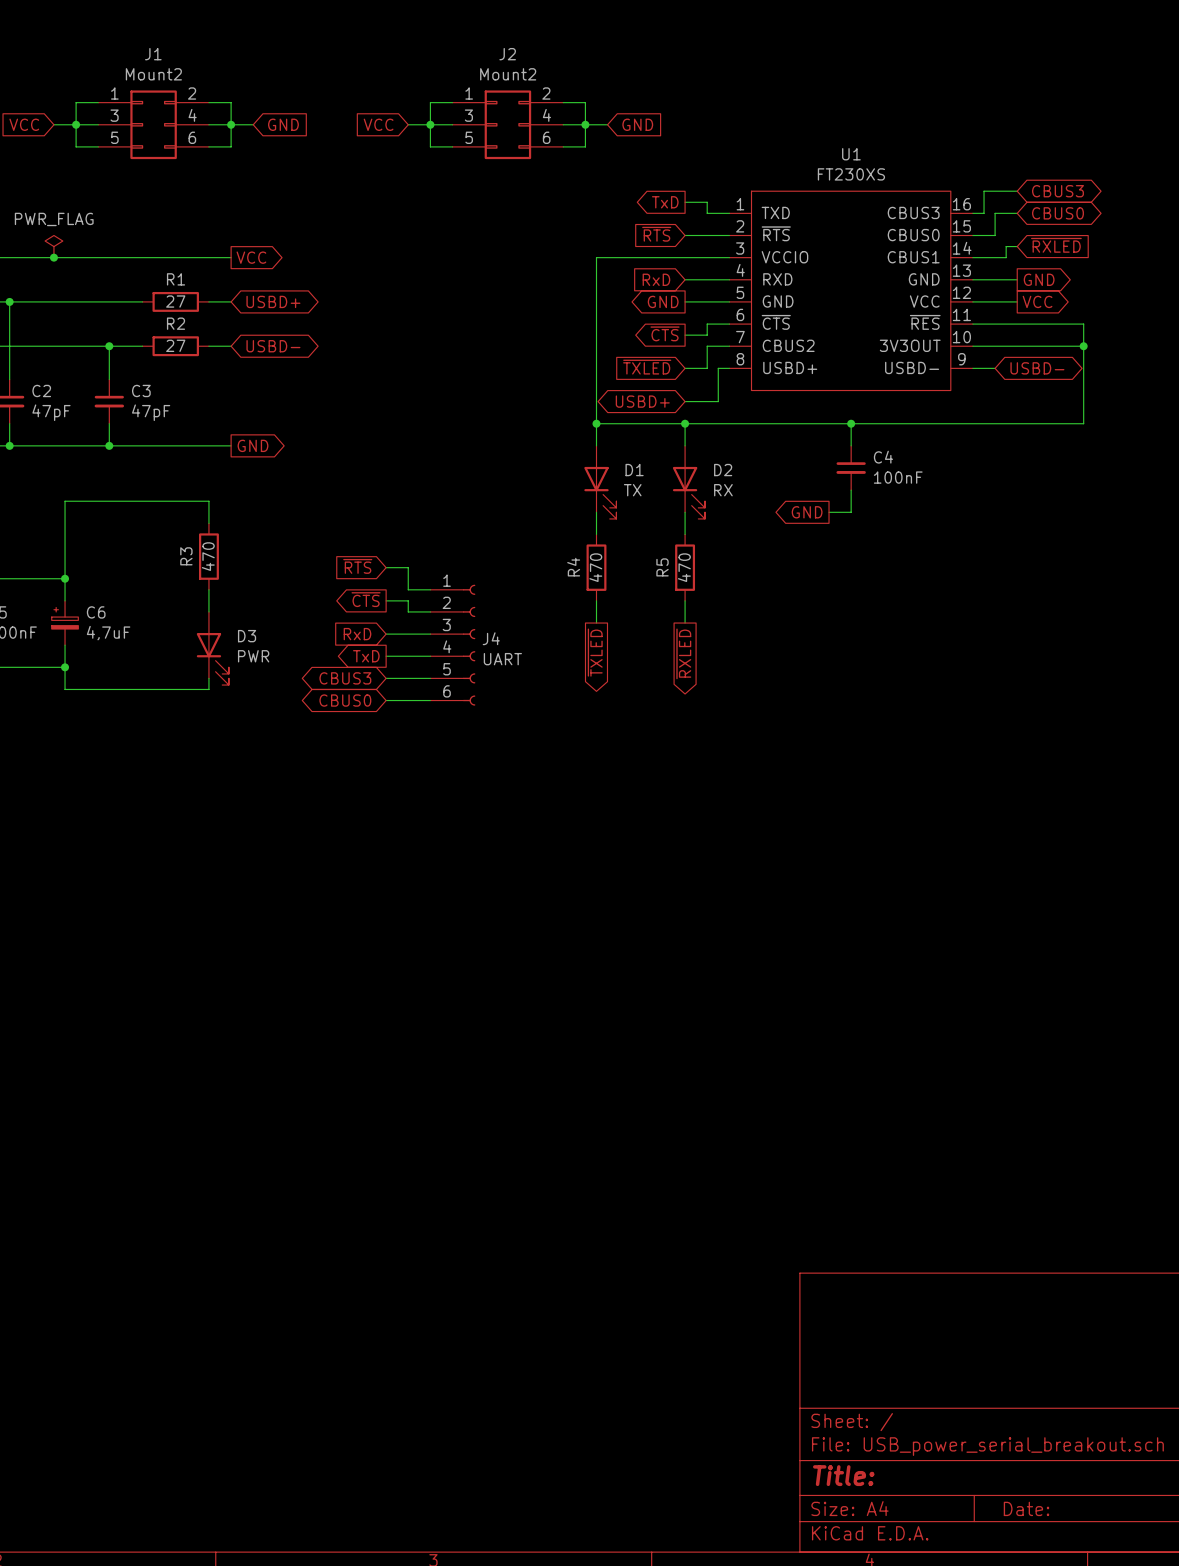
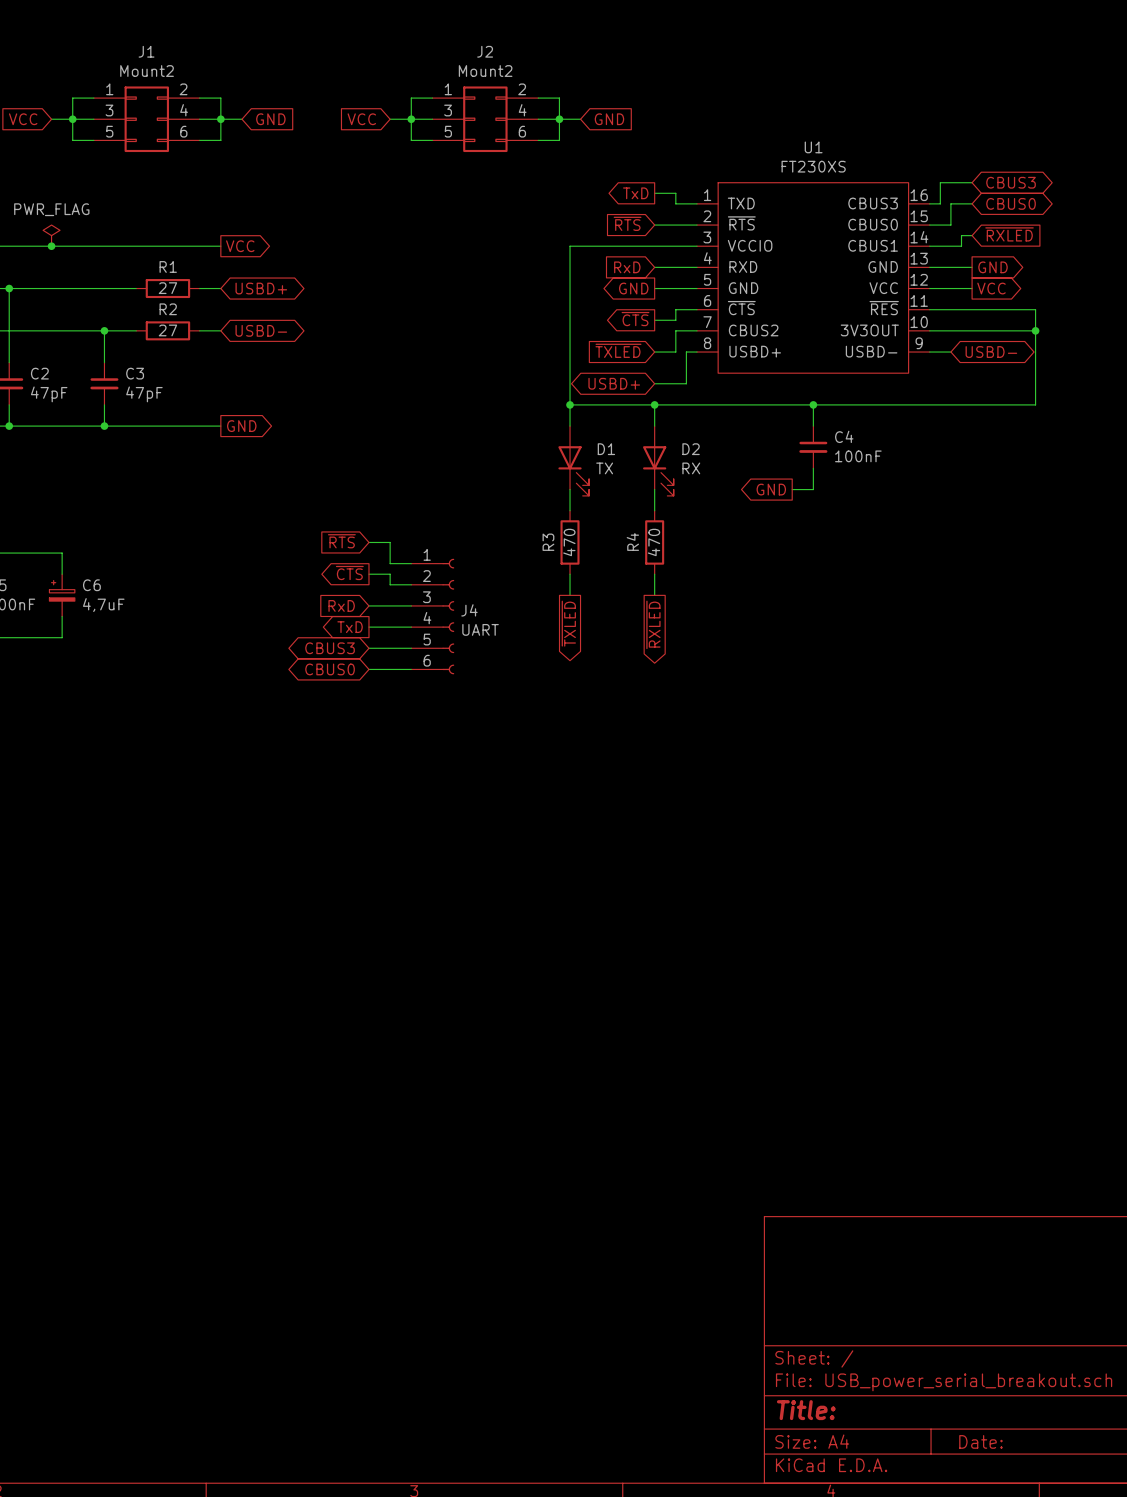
wire: (208, 523) (208, 501) (65, 501) (65, 578) -> none
R3: 470 (208, 556) -> none
R4 name: R4 (573, 567) -> R3 (548, 542)
R5 name: R5 (662, 567) -> R4 (632, 541)
junction: (65, 578) -> none
wire: (208, 589) (208, 611) -> none
D3: PWR (212, 648) -> none
wire: (65, 667) (65, 689) (208, 689) (208, 678) -> none
junction: (65, 667) -> none

